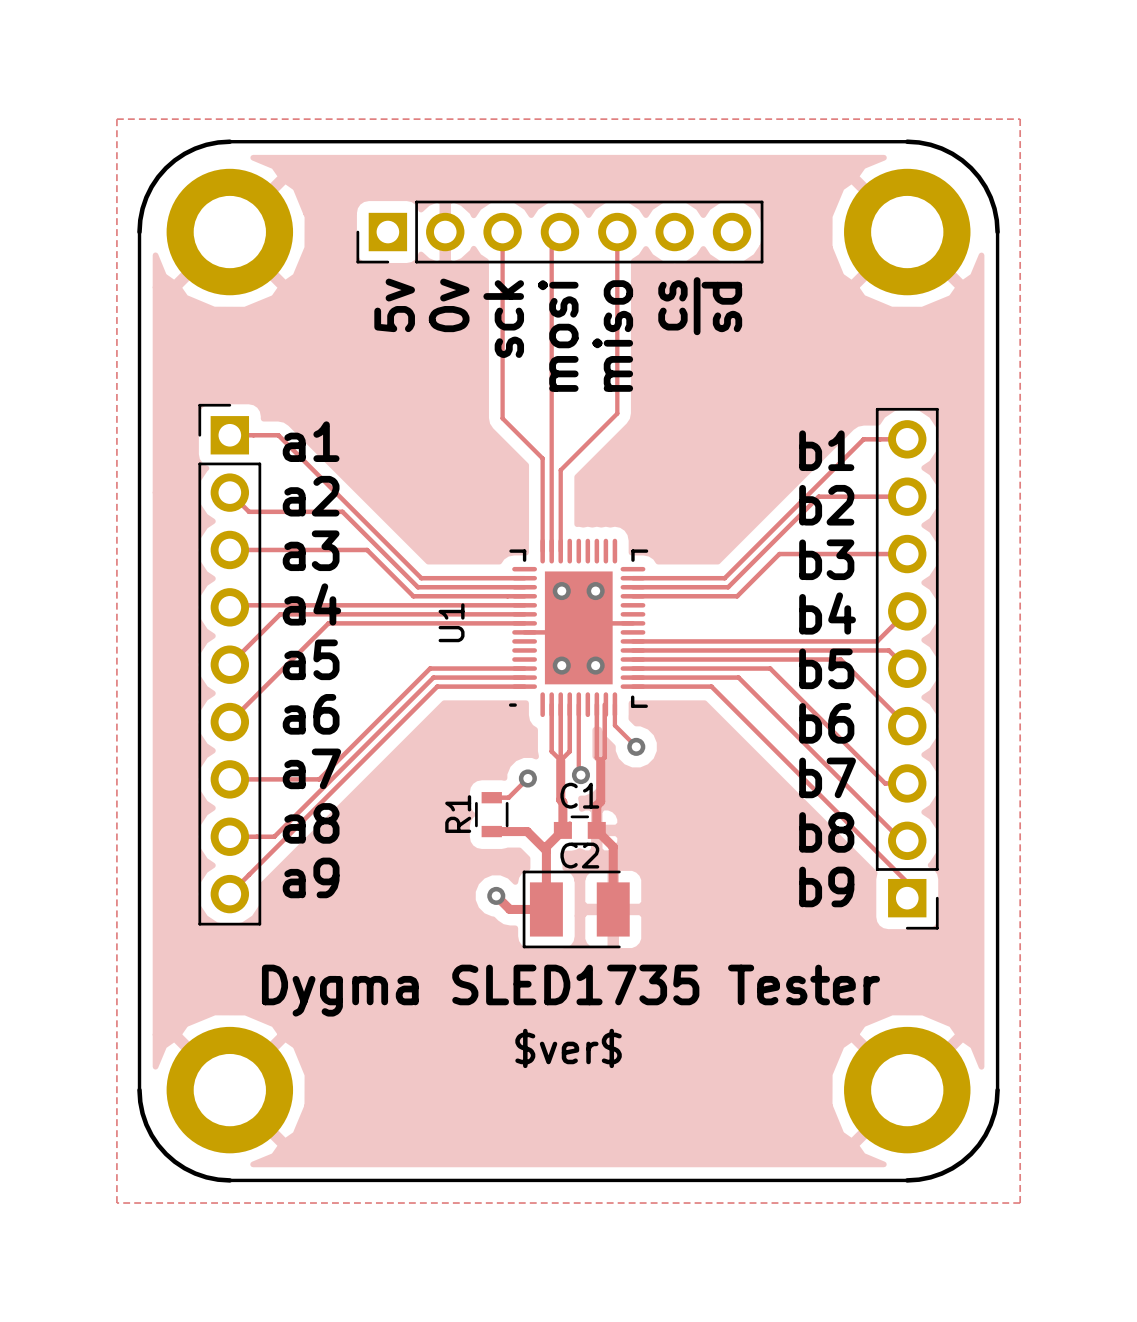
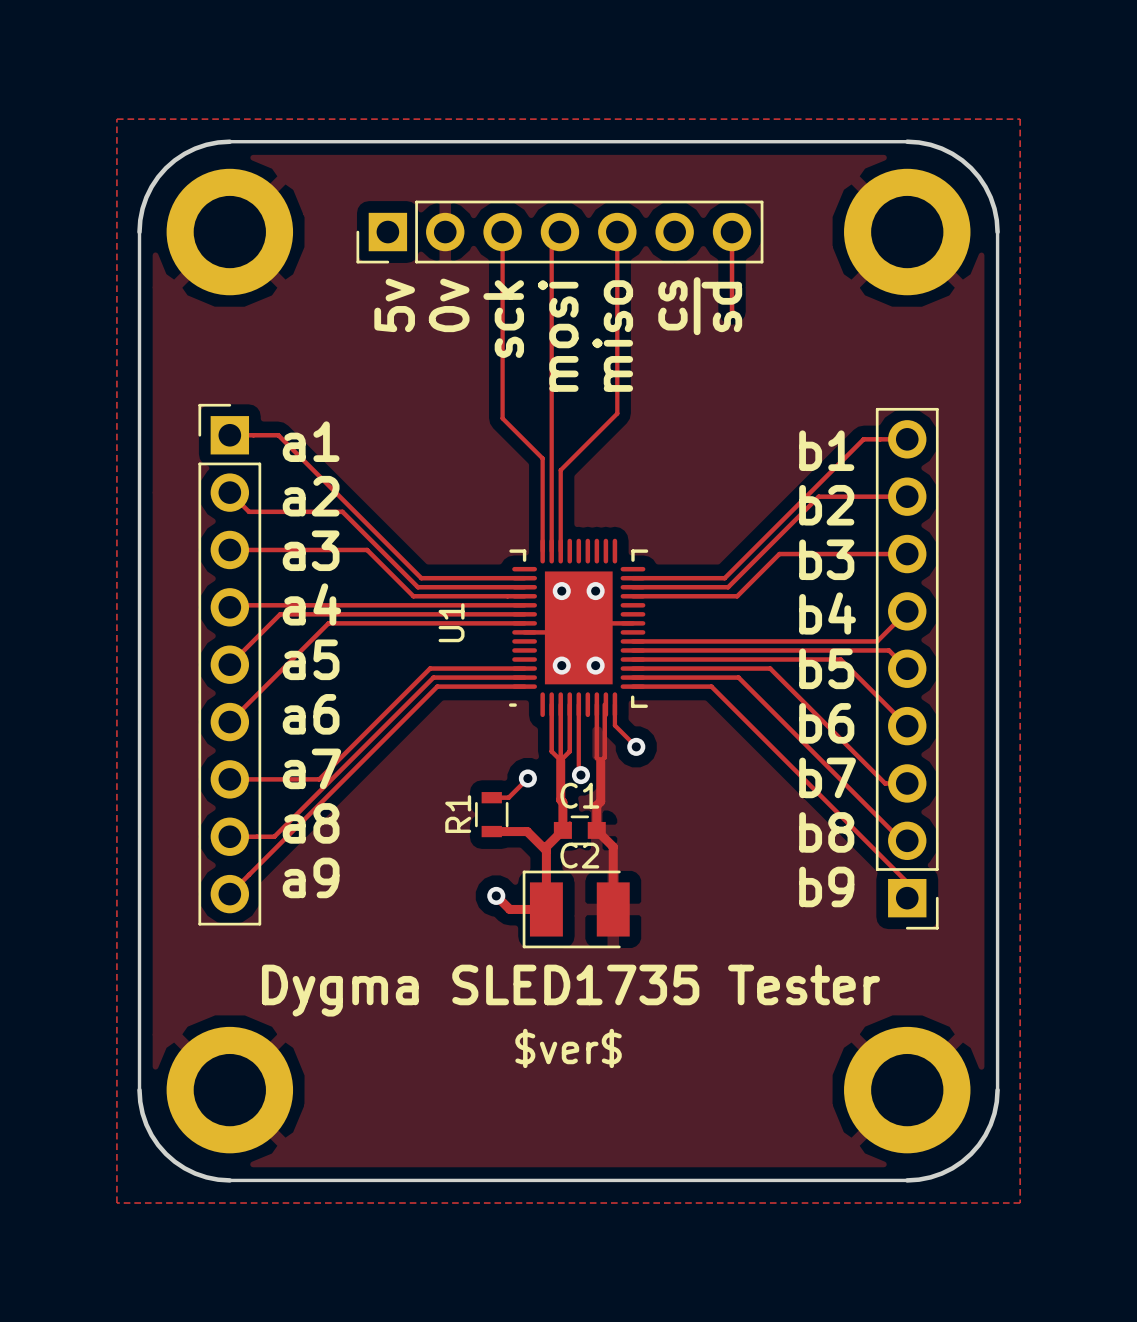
track: none -> (732, 232) (732, 310)

